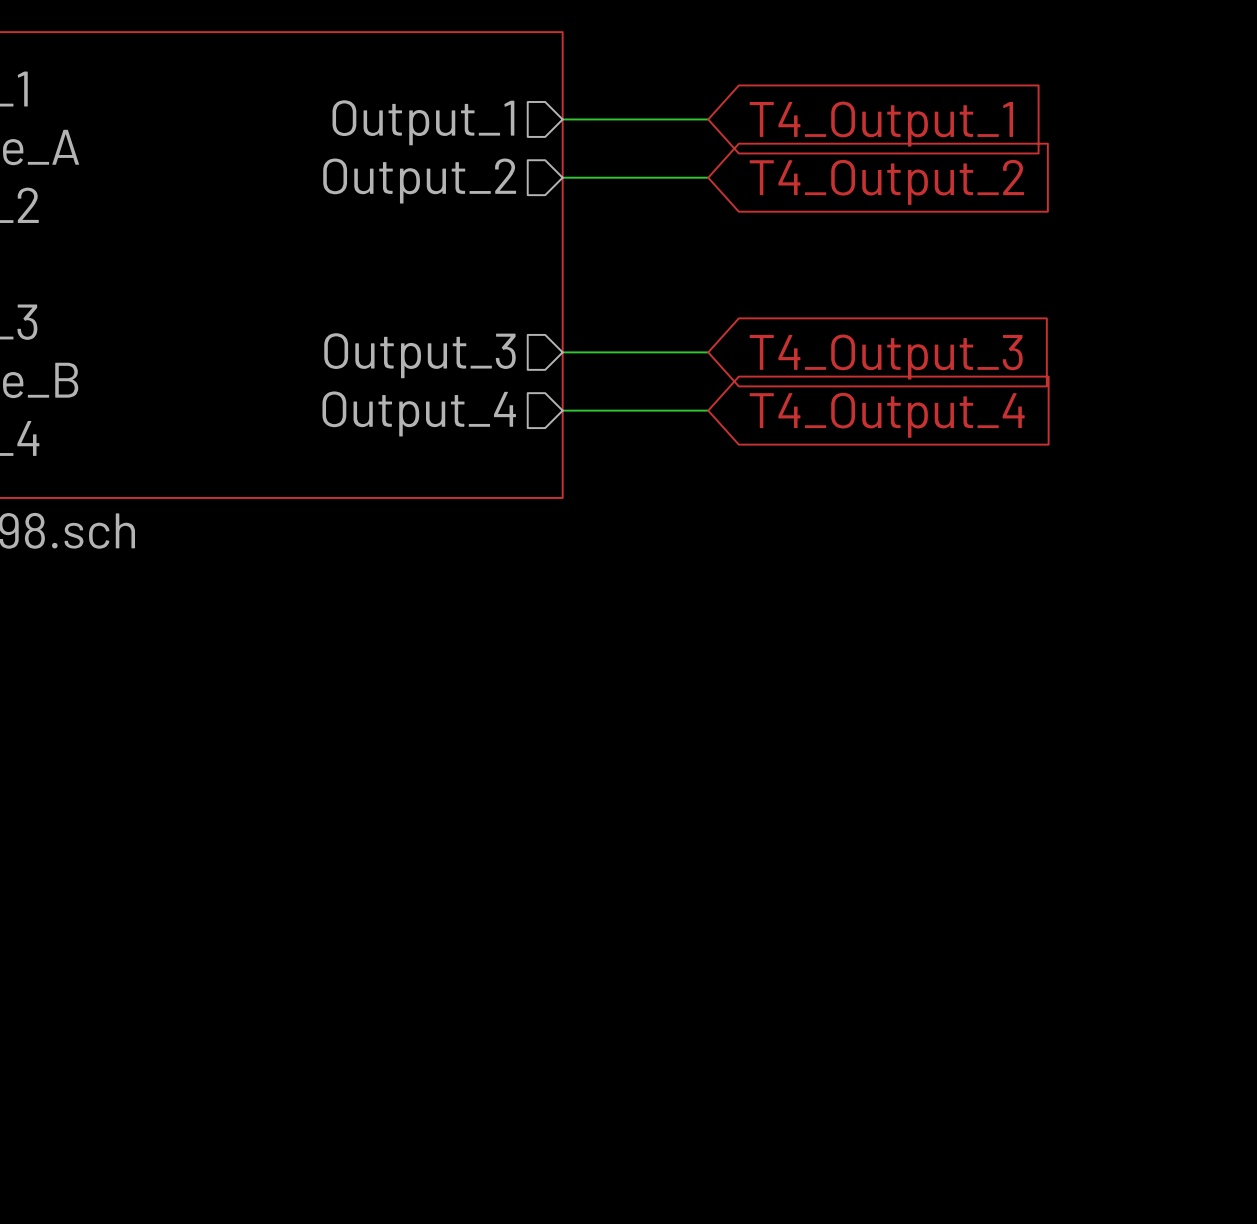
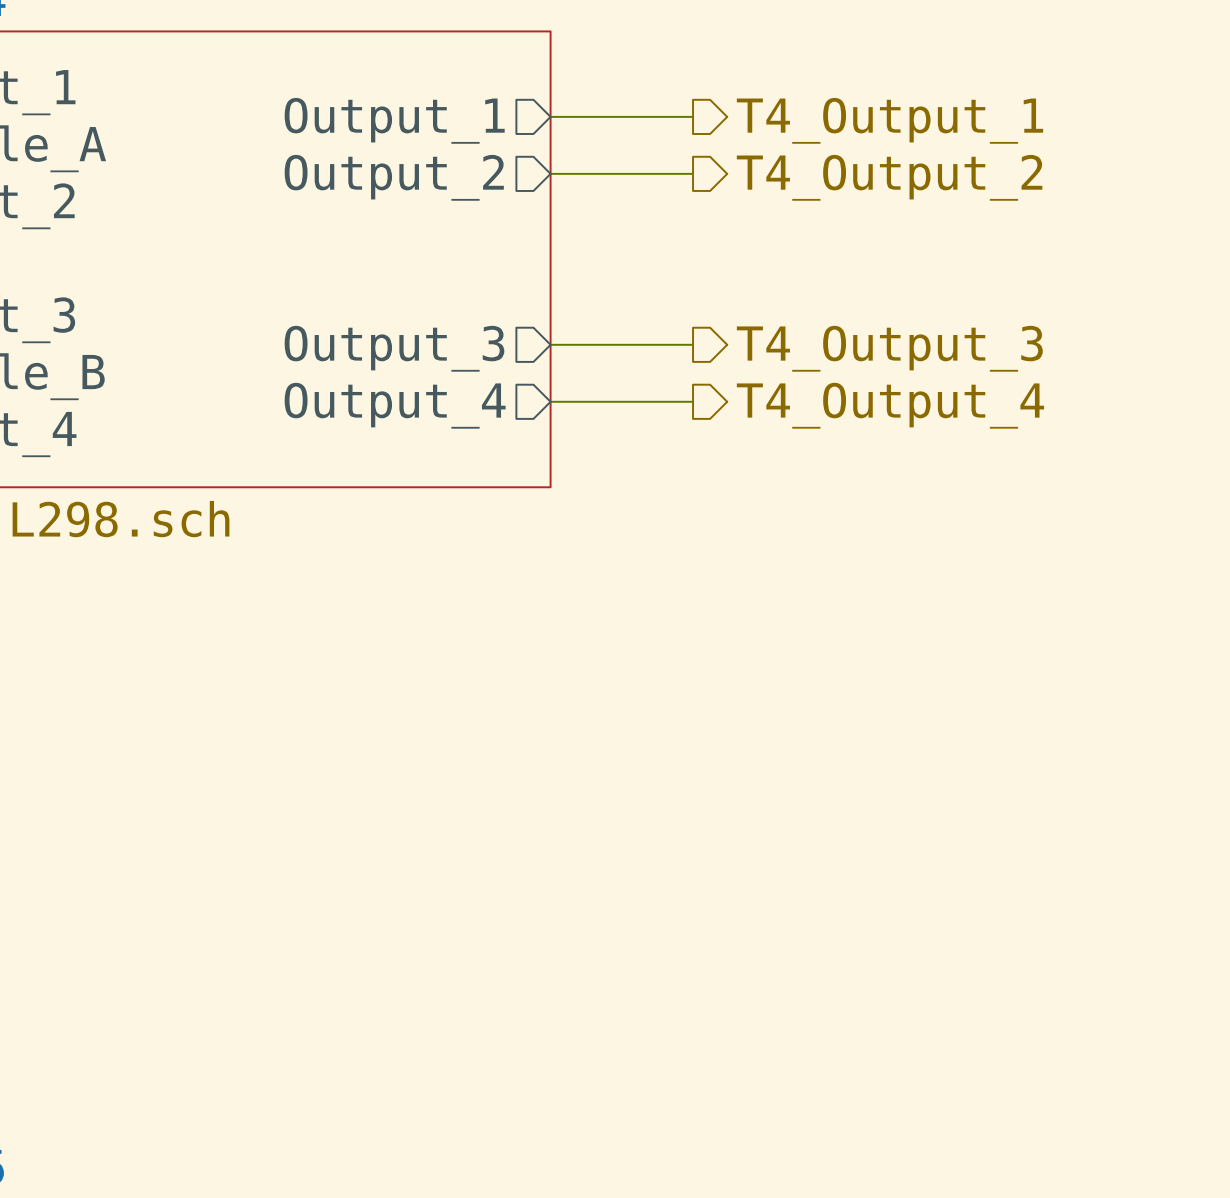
hierarchical label: none -> T4_Output_1 (889, 120)
global label: T4_Output_1 (881, 124) -> none
hierarchical label: none -> T4_Output_2 (889, 177)
global label: T4_Output_2 (886, 182) -> none
hierarchical label: none -> T4_Output_3 (889, 348)
global label: T4_Output_3 (886, 357) -> none
hierarchical label: none -> T4_Output_4 (890, 405)
global label: T4_Output_4 (887, 415) -> none

